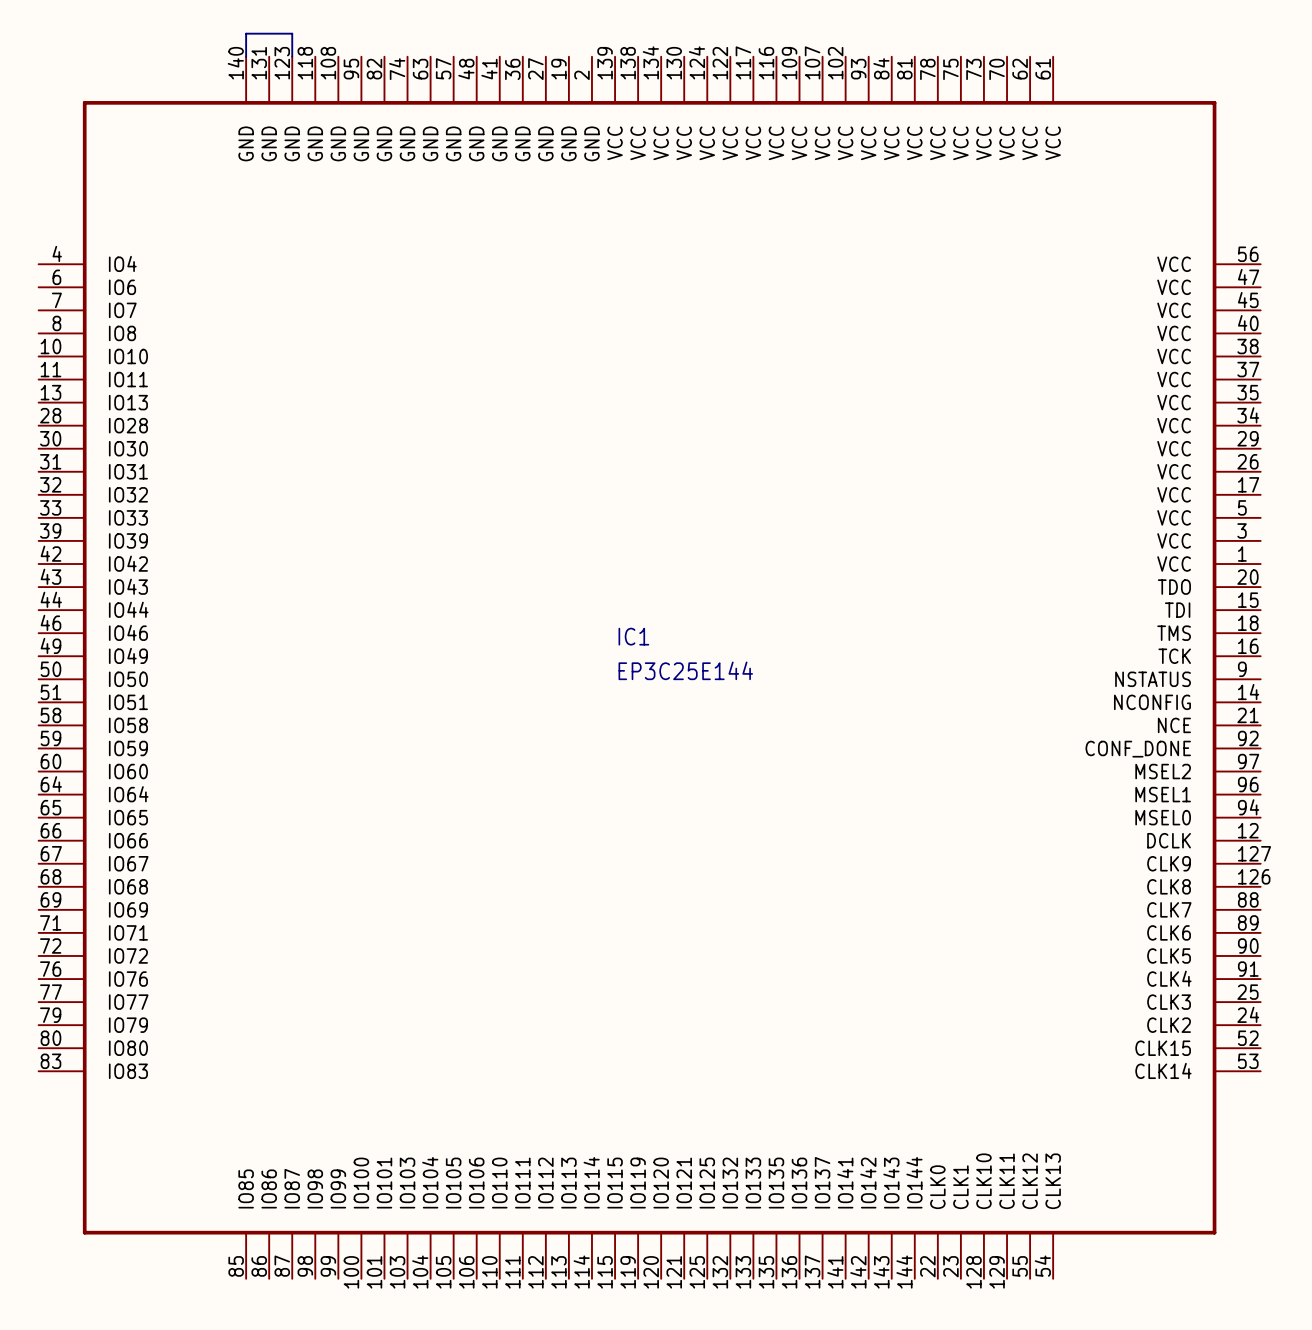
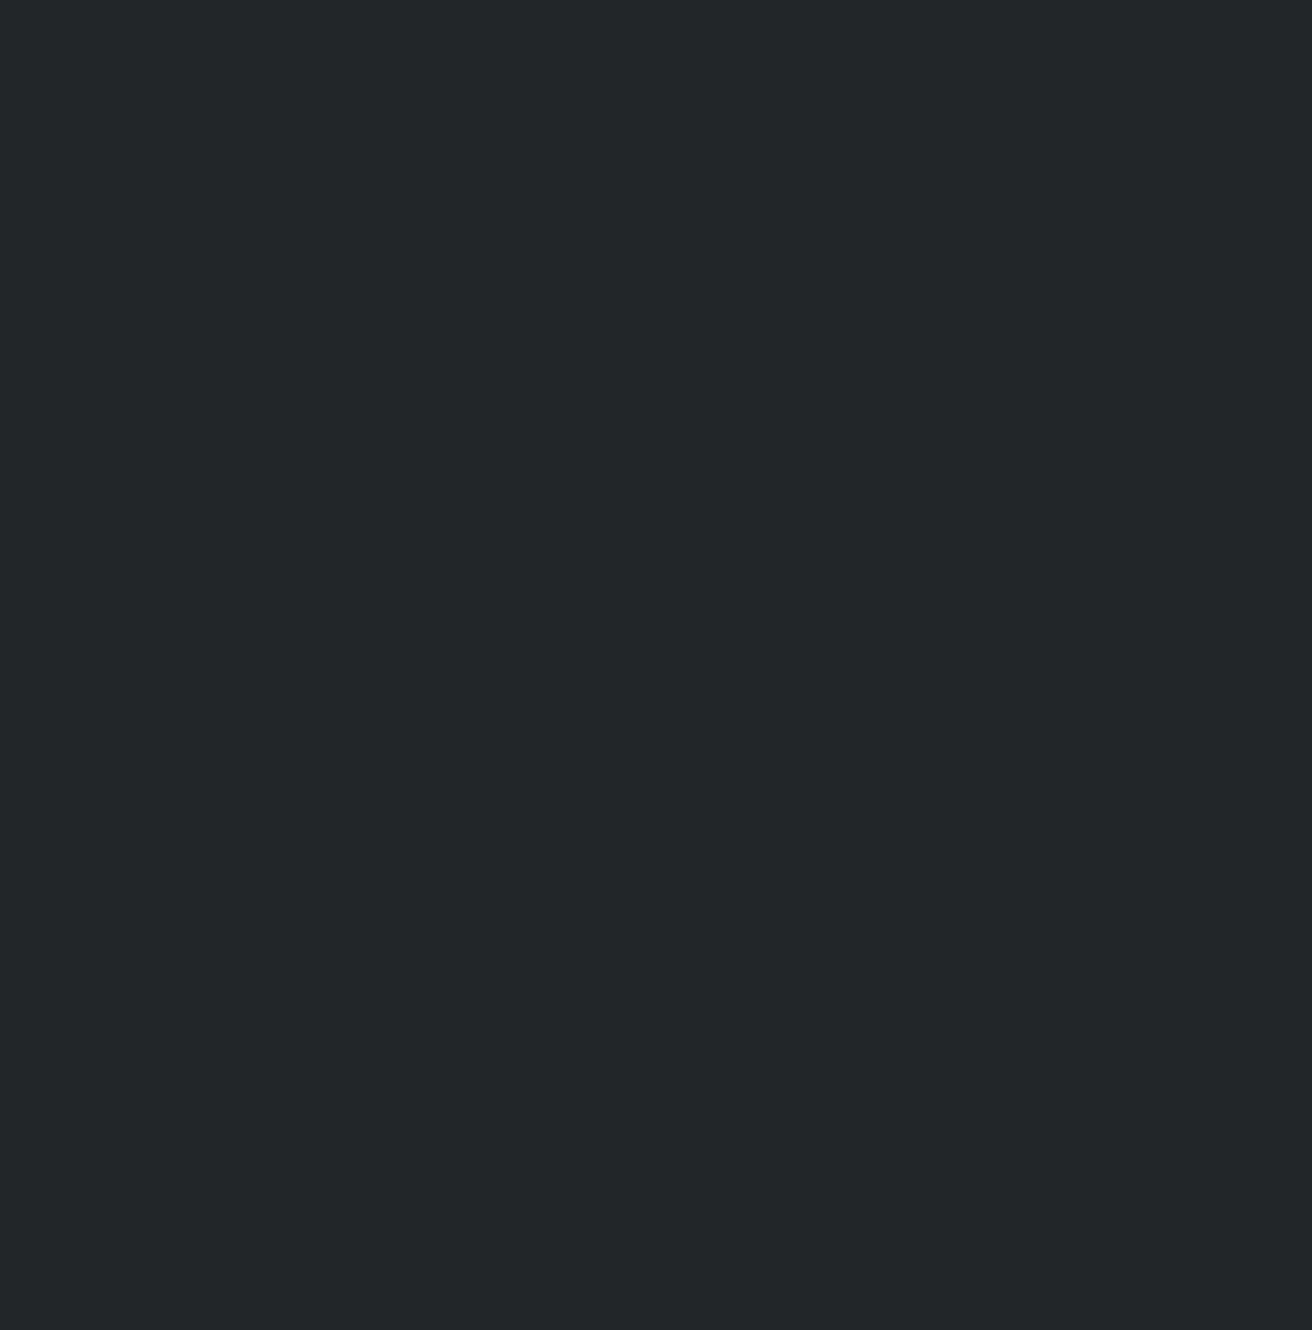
wire: (246, 56) (246, 33) (292, 33) (292, 56) -> none
IC1: EP3C25E144 (649, 667) -> none

